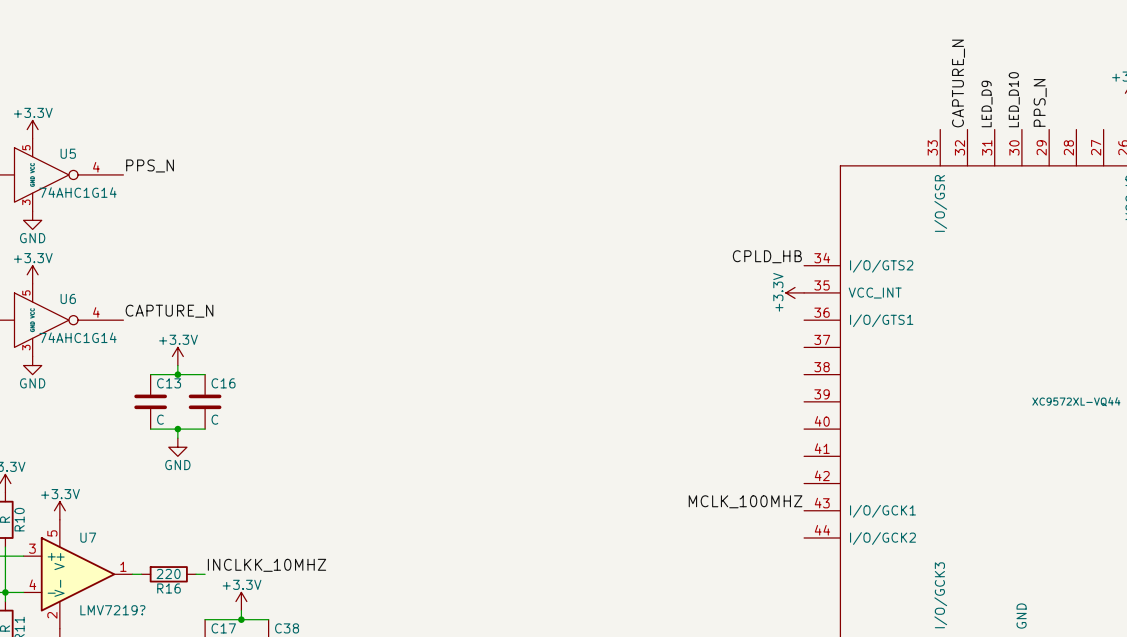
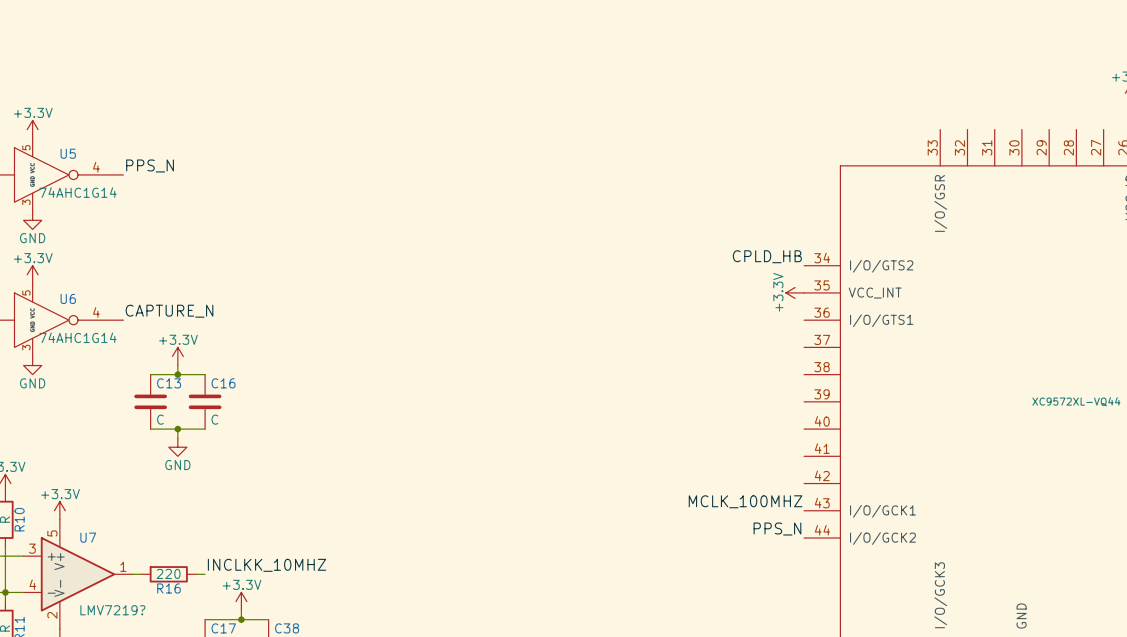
label: CAPTURE_N (958, 83) -> none
label: LED_D10 (1014, 99) -> none
label: PPS_N (1040, 102) -> none
label: LED_D9 (987, 104) -> none
label: none -> PPS_N (777, 529)

